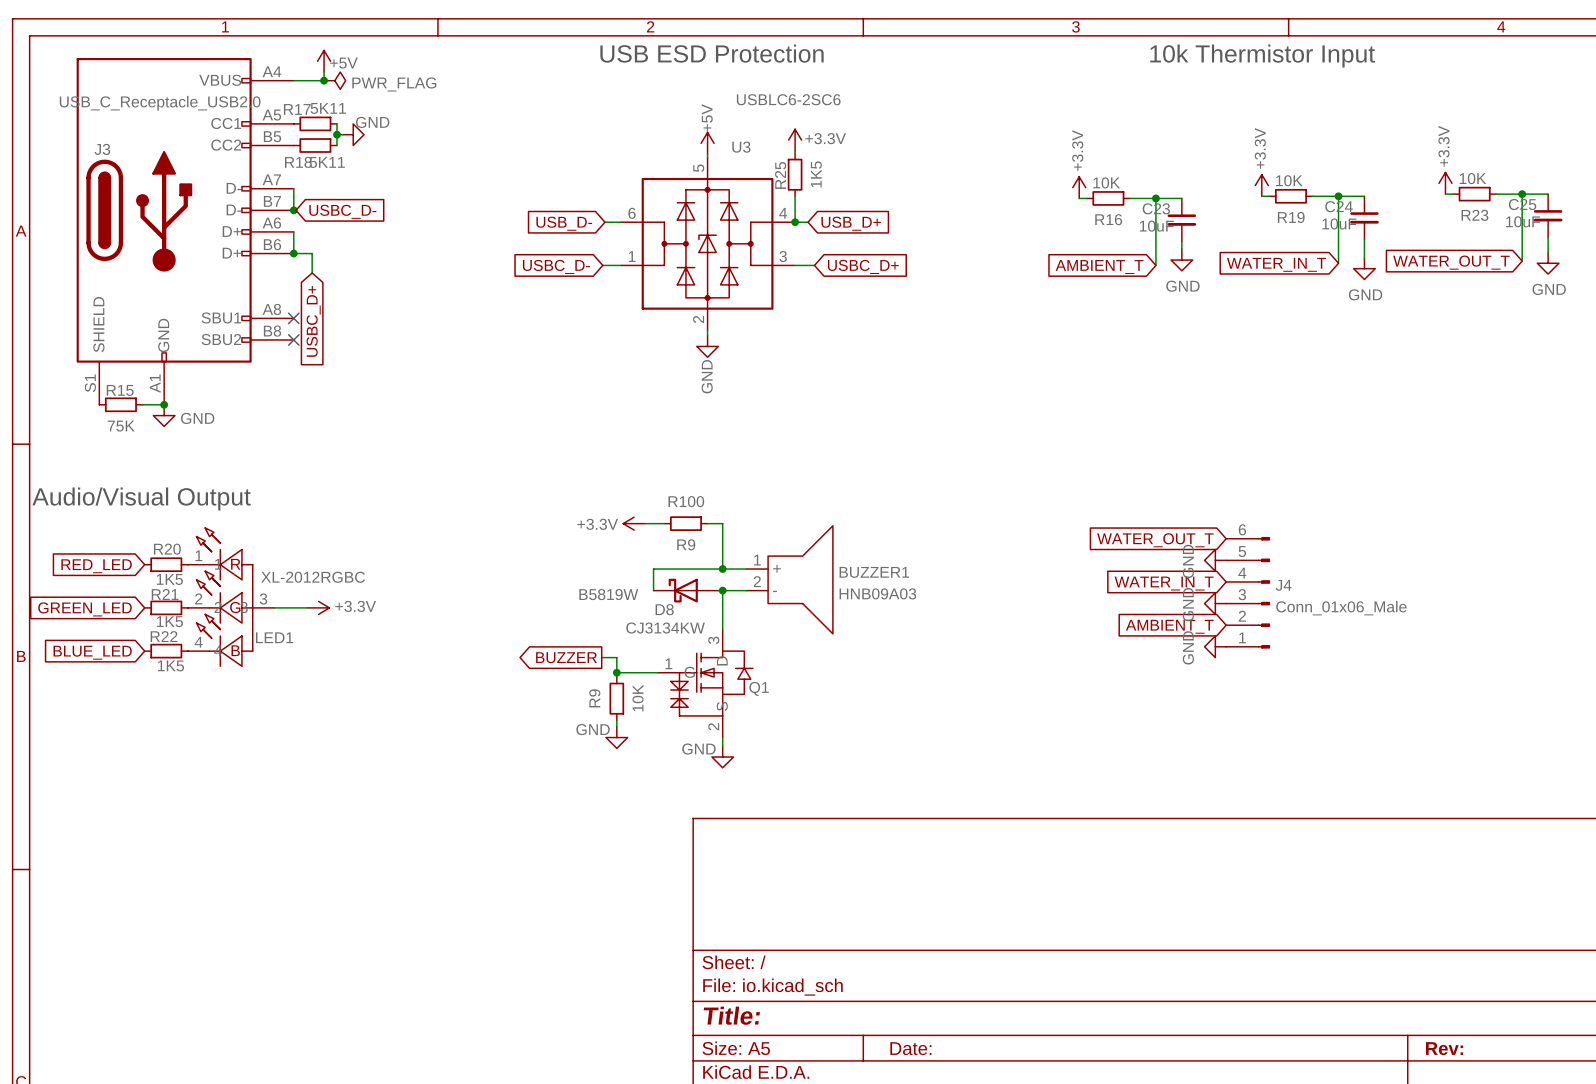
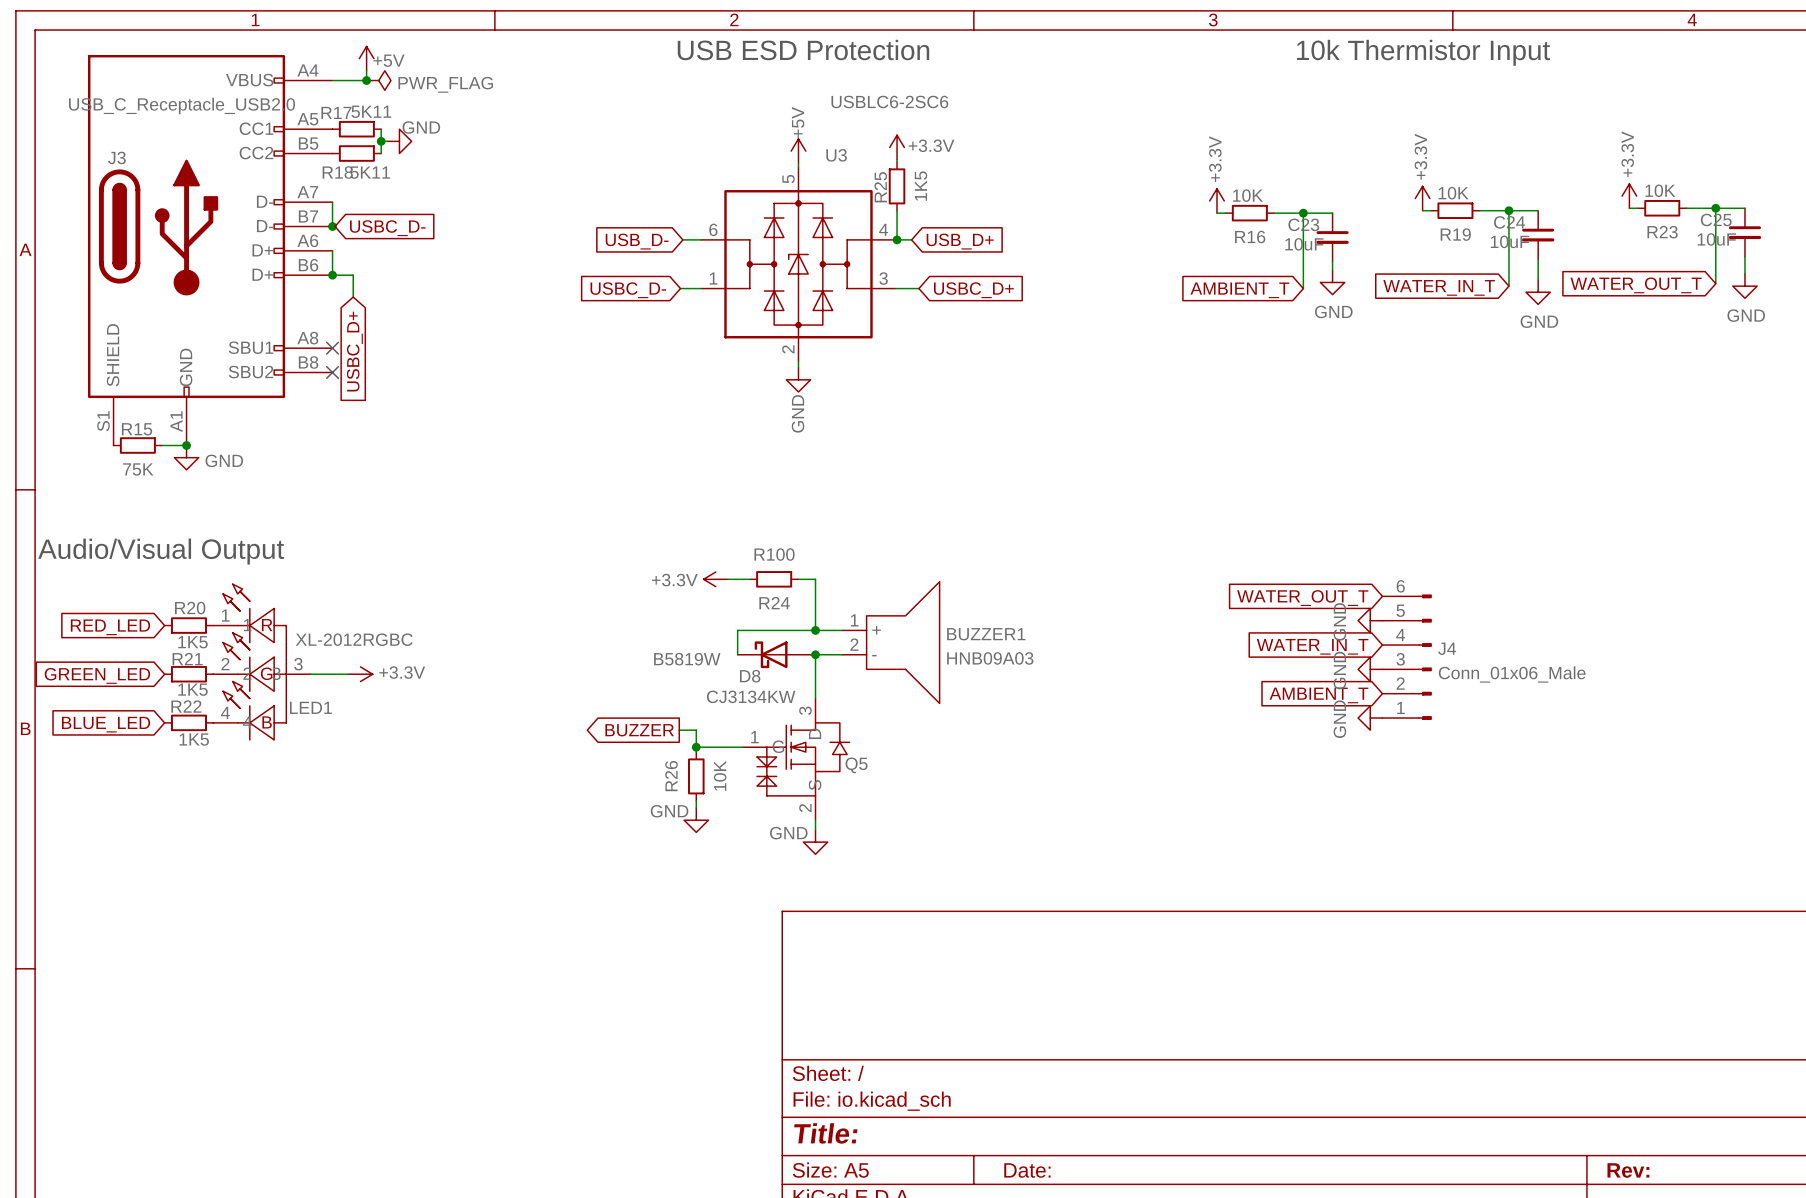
R9 name: R9 (686, 544) -> R24 (774, 603)
Q1 name: Q1 (759, 688) -> Q5 (856, 765)
R9 name: R9 (594, 698) -> R26 (671, 776)

